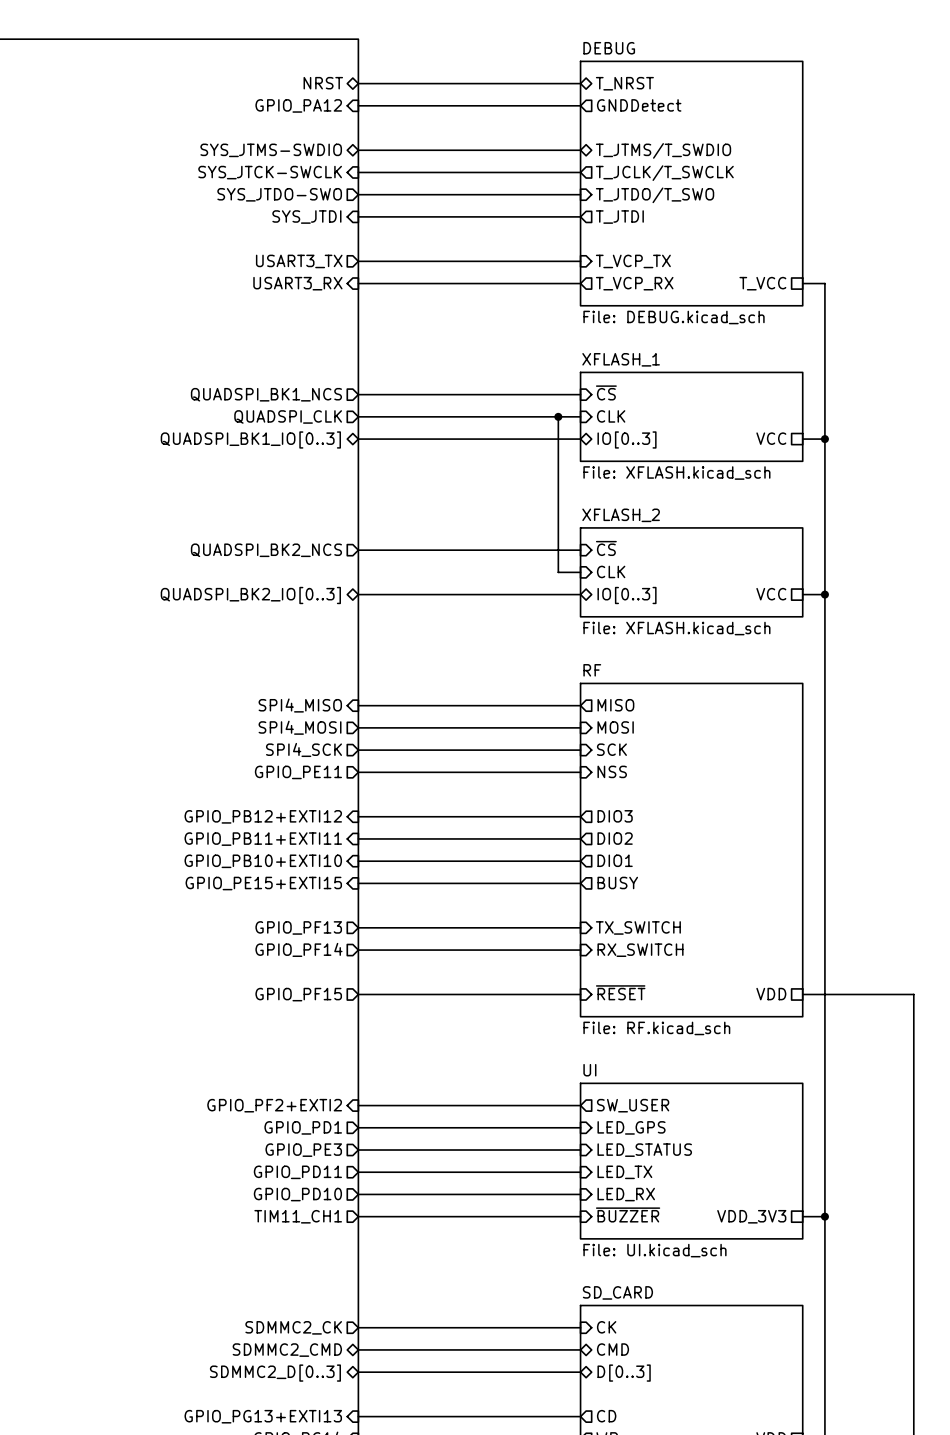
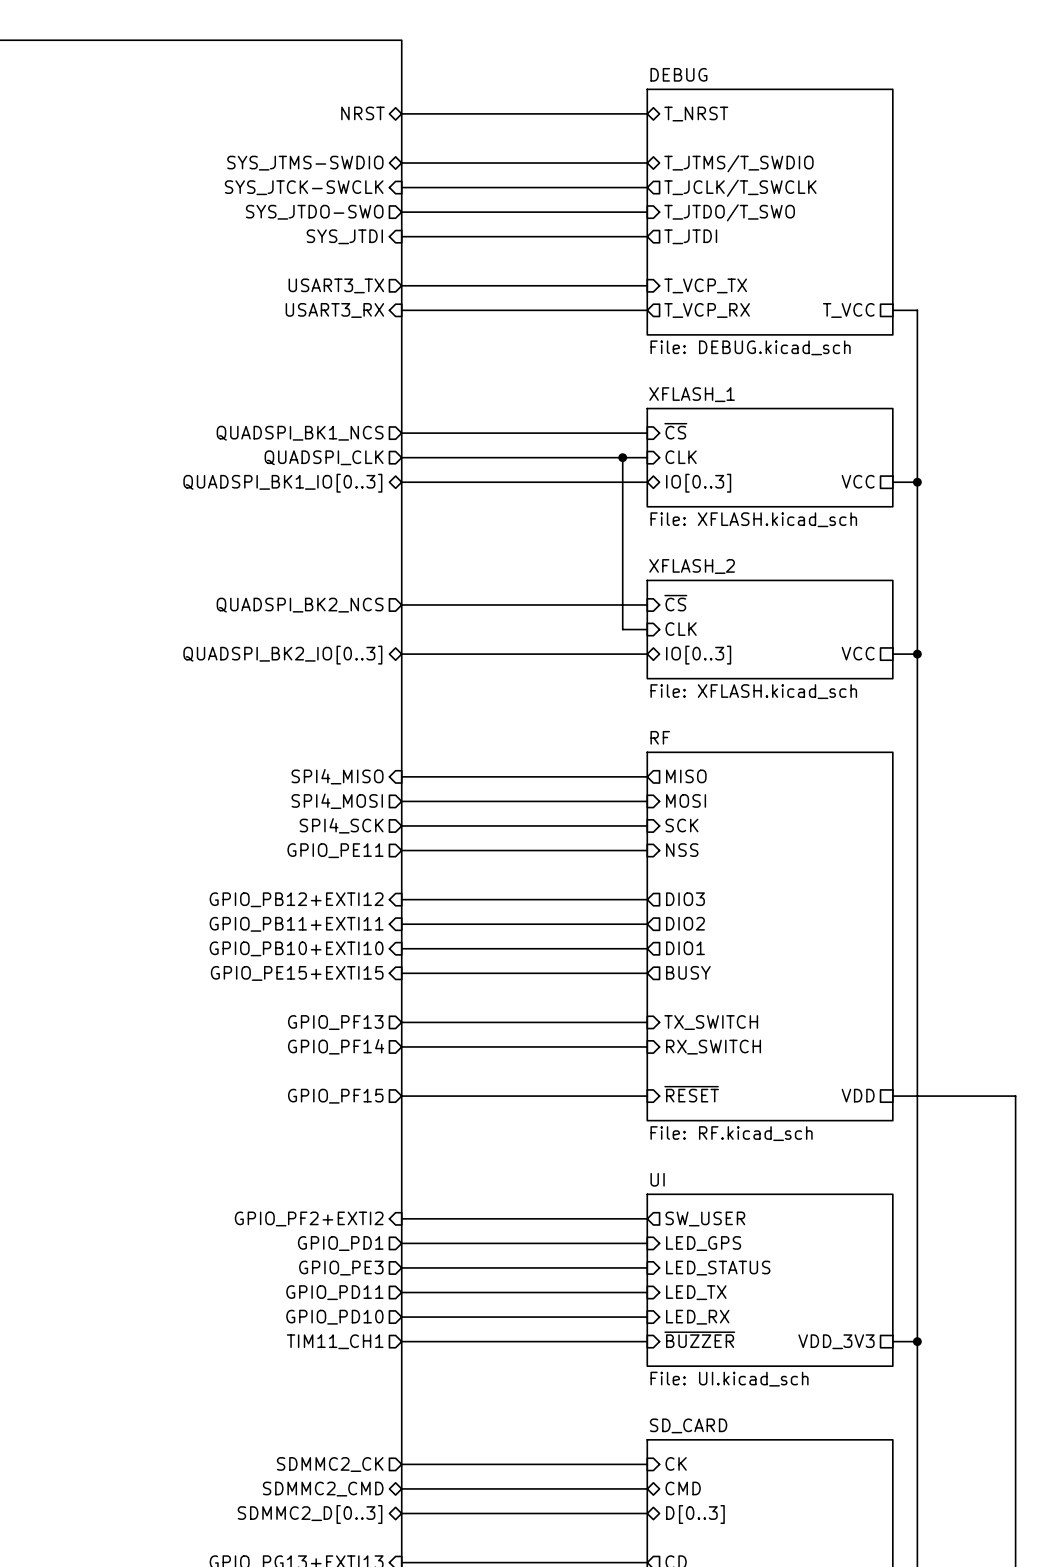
sheet pin: NRST (323, 83) -> none
wire: (358, 83) (580, 83) -> none
sheet pin: T_NRST (624, 83) -> none
sheet pin shape: input (298, 105) -> bidirectional (362, 113)
sheet pin: GPIO_PA12 (298, 105) -> NRST (362, 113)
sheet pin shape: output (639, 105) -> bidirectional (696, 114)
sheet pin: GNDDetect (639, 105) -> T_NRST (696, 114)
sheet DEBUG: File: DEBUG.kicad_sch (691, 183) -> none
sheet DEBUG: none -> File: DEBUG.kicad_sch (770, 212)

